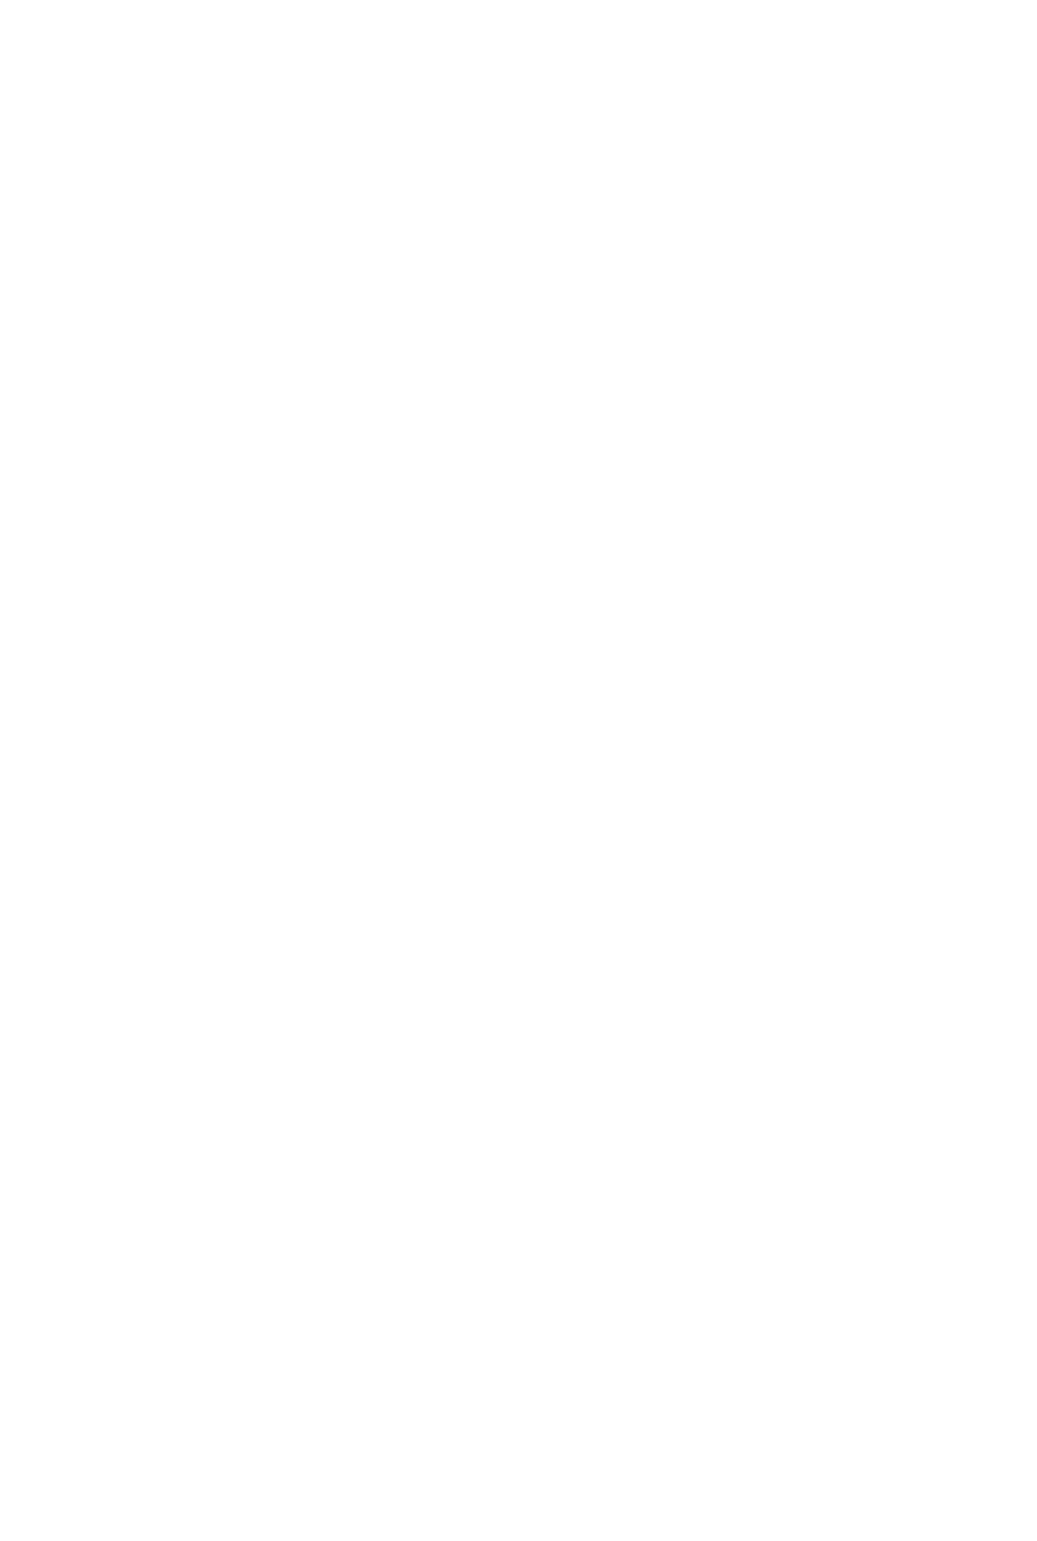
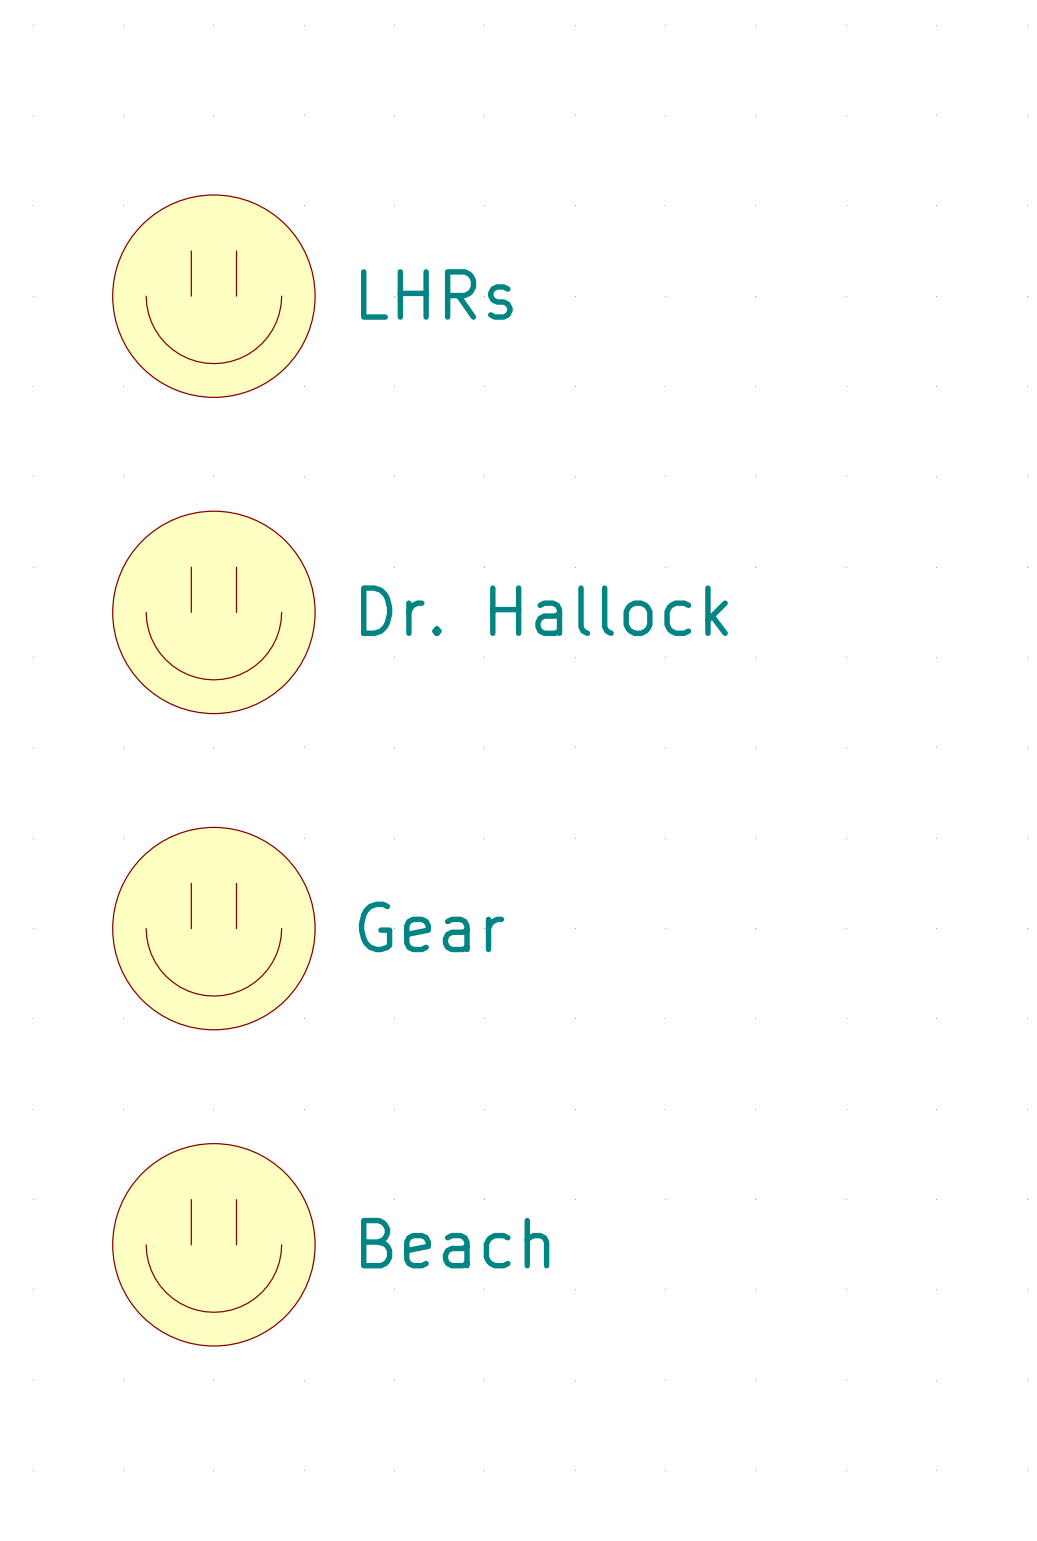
part: none -> LHRs (213, 296)
part: none -> Dr. Hallock (213, 612)
part: none -> Gear (213, 928)
part: none -> Beach (213, 1244)

